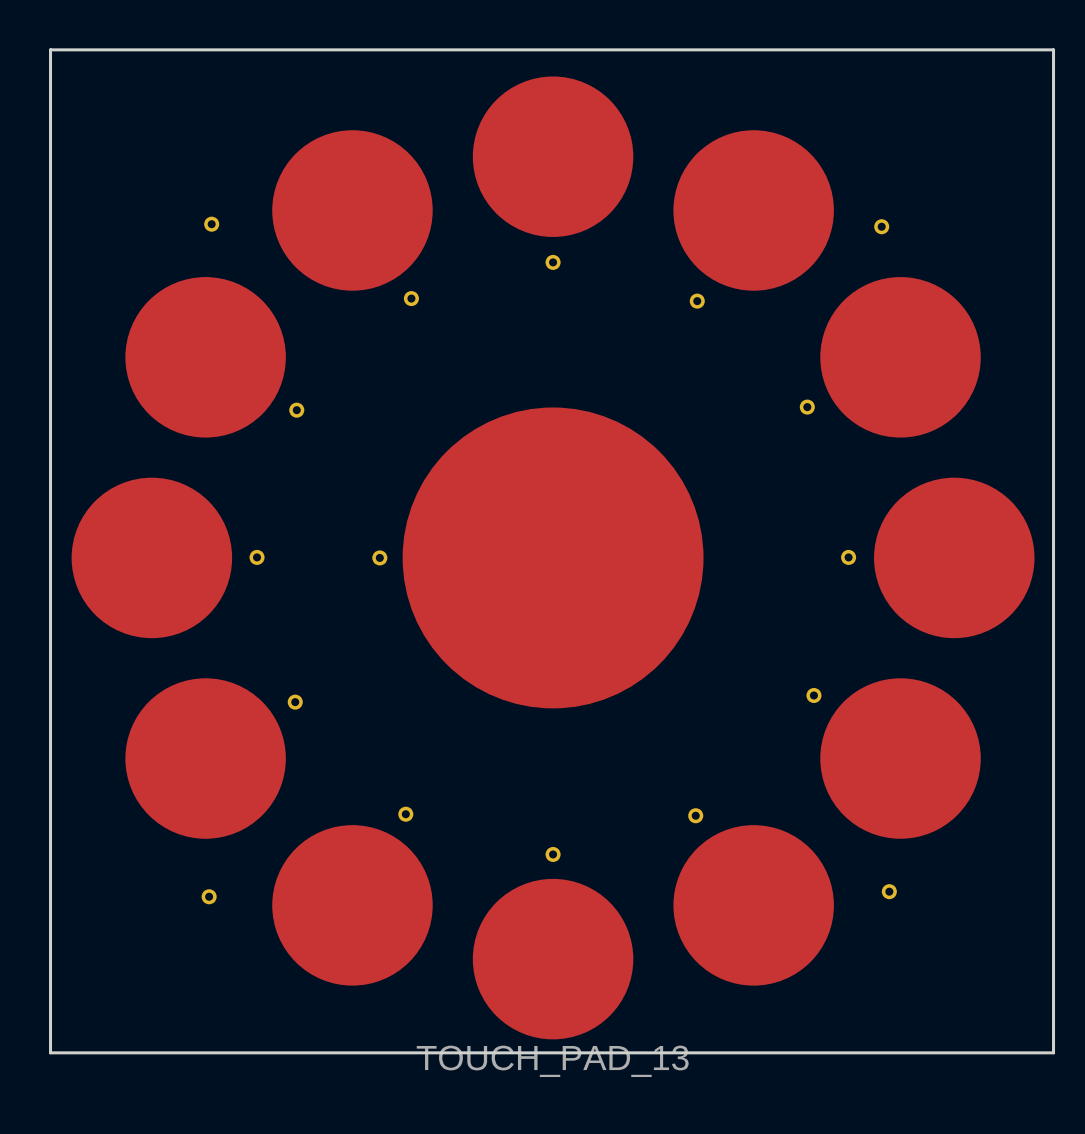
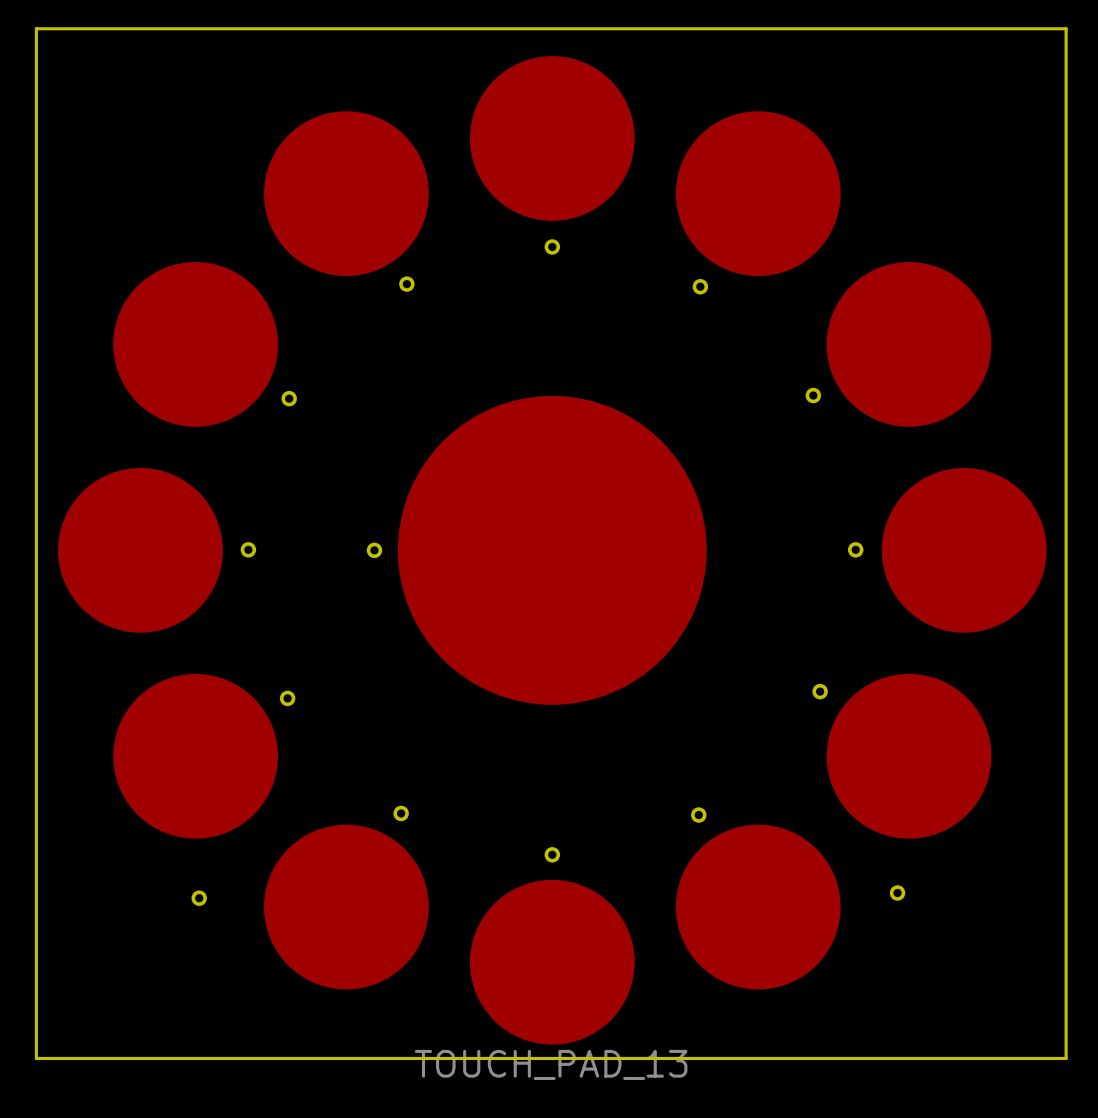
part footprint: [71, 76, 1035, 1040] -> [58, 56, 1047, 1045]

